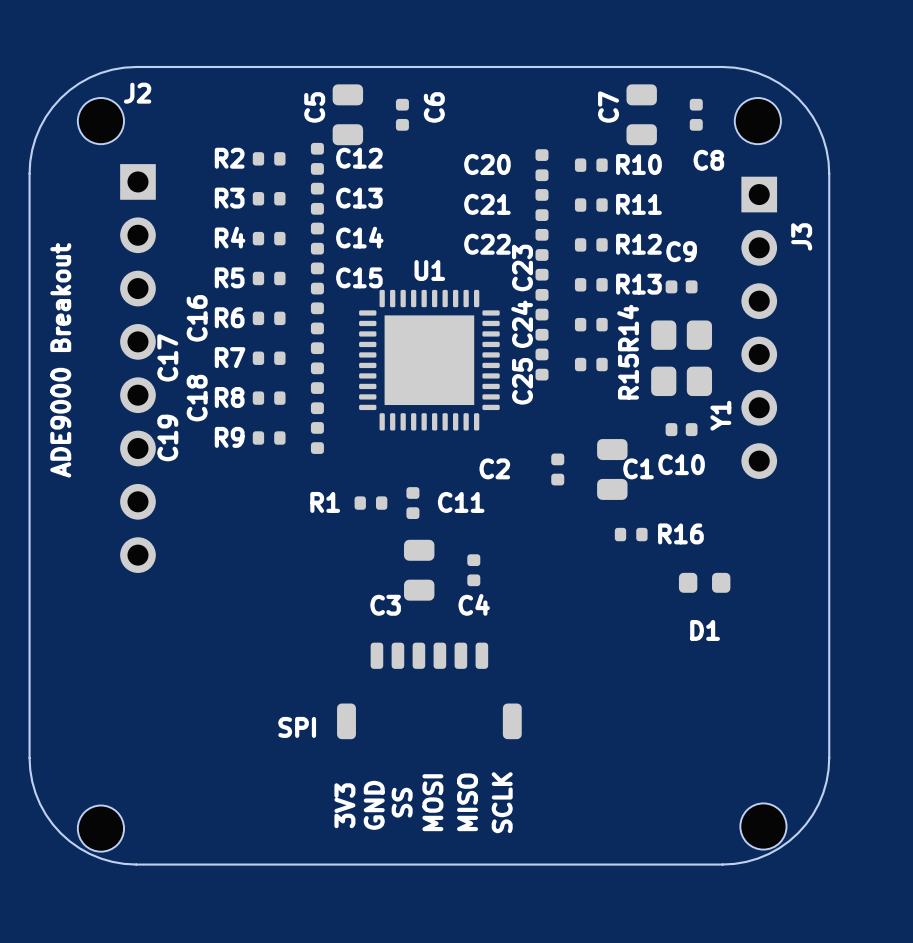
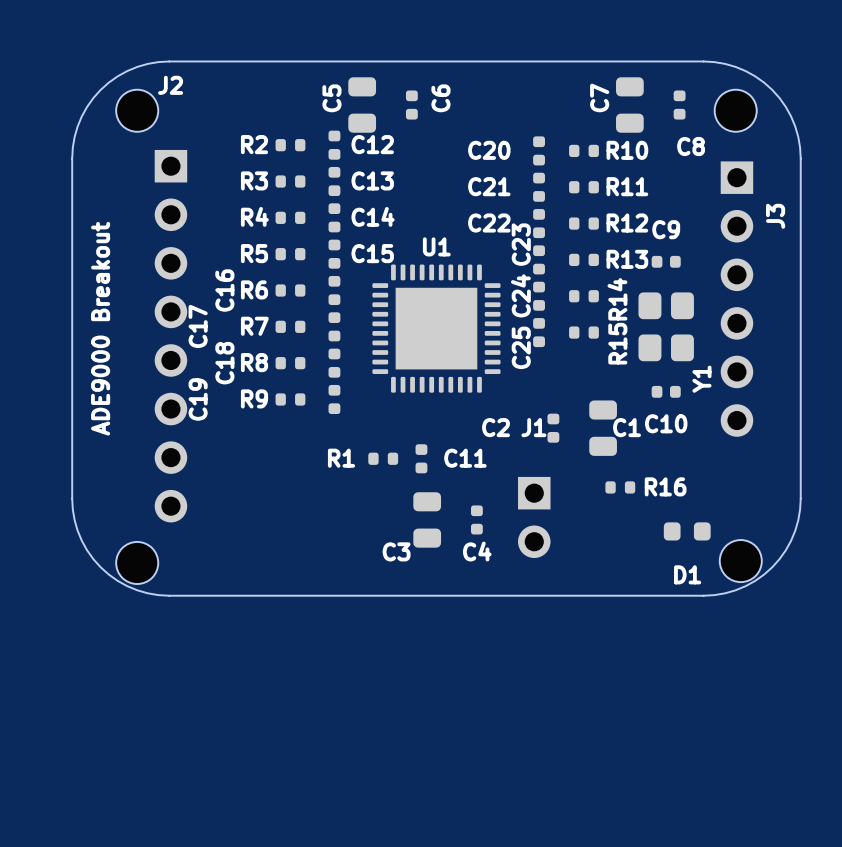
board edge: (29, 546) (29, 757) (35, 793) (52, 824) (79, 848) (100, 858) (136, 864) (722, 864) (746, 861) (768, 853) (789, 841) (805, 824) (818, 804) (826, 781) (829, 757) (829, 546) -> (72, 498) (74, 520) (81, 540) (100, 567) (117, 580) (137, 590) (169, 595) (714, 595) (745, 586) (772, 567) (785, 550) (795, 530) (800, 498)
J1: none -> (534, 517)
part: (429, 690) -> none
text: SPI (297, 727) -> none
text: SS (402, 802) -> none
text: MOSI (432, 802) -> none
text: MISO (467, 802) -> none
text: SCLK (502, 802) -> none
text: 3V3 (344, 805) -> none
text: GND (374, 805) -> none
part position: (763, 826) -> (740, 561)
part position: (100, 828) -> (137, 562)

